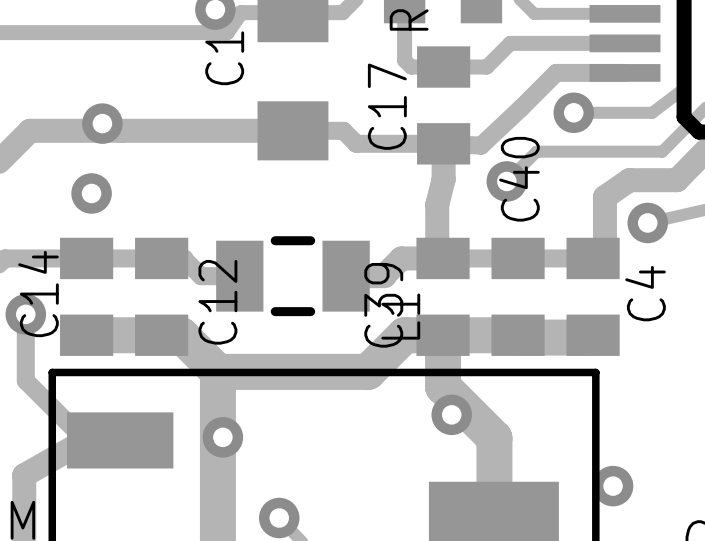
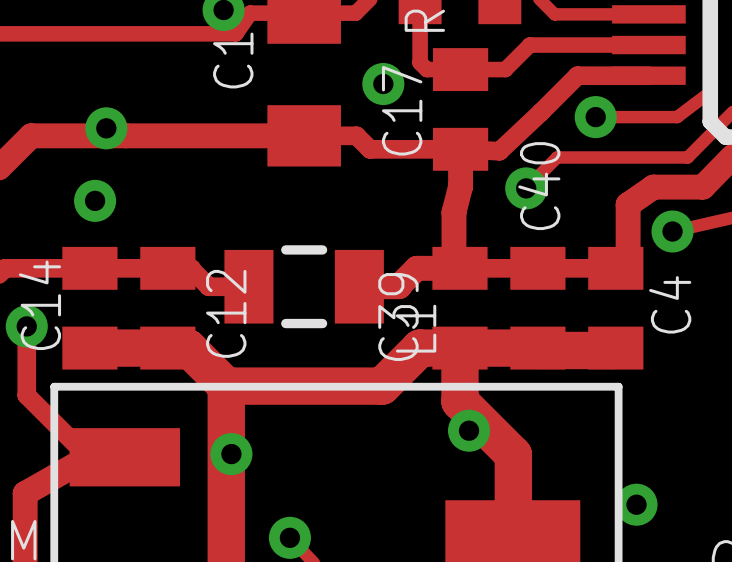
via: none -> (383, 84)

